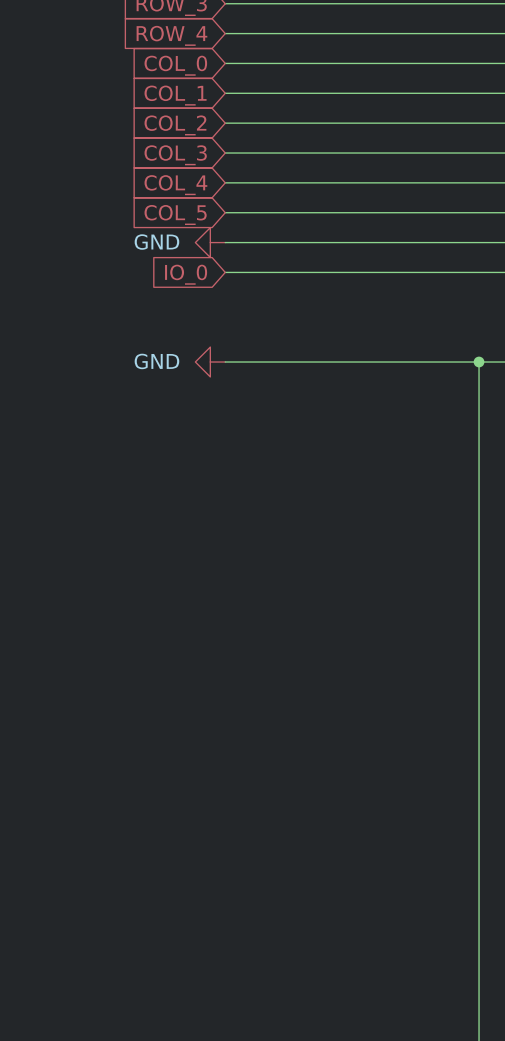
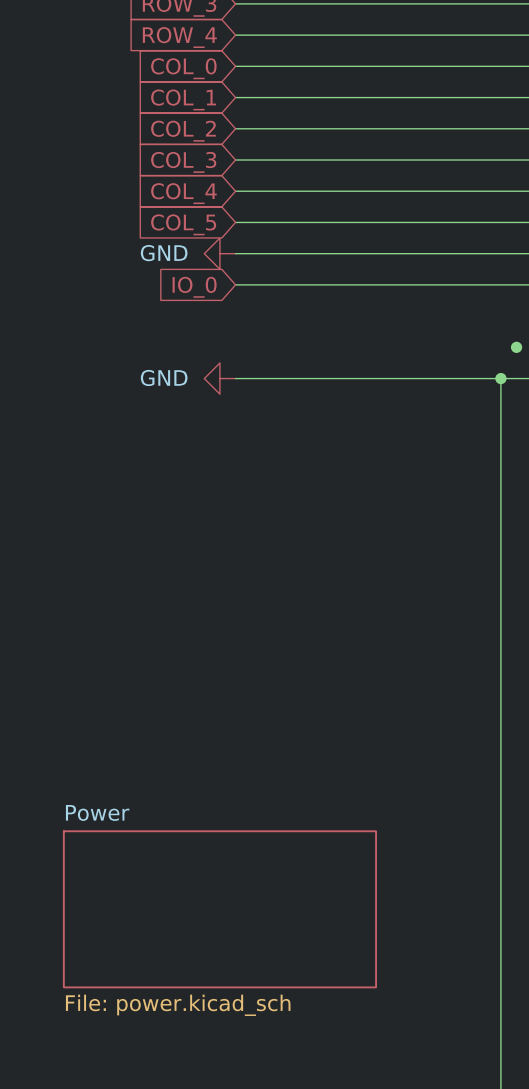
junction: none -> (516, 347)
sheet Power: none -> File: power.kicad_sch (219, 909)

